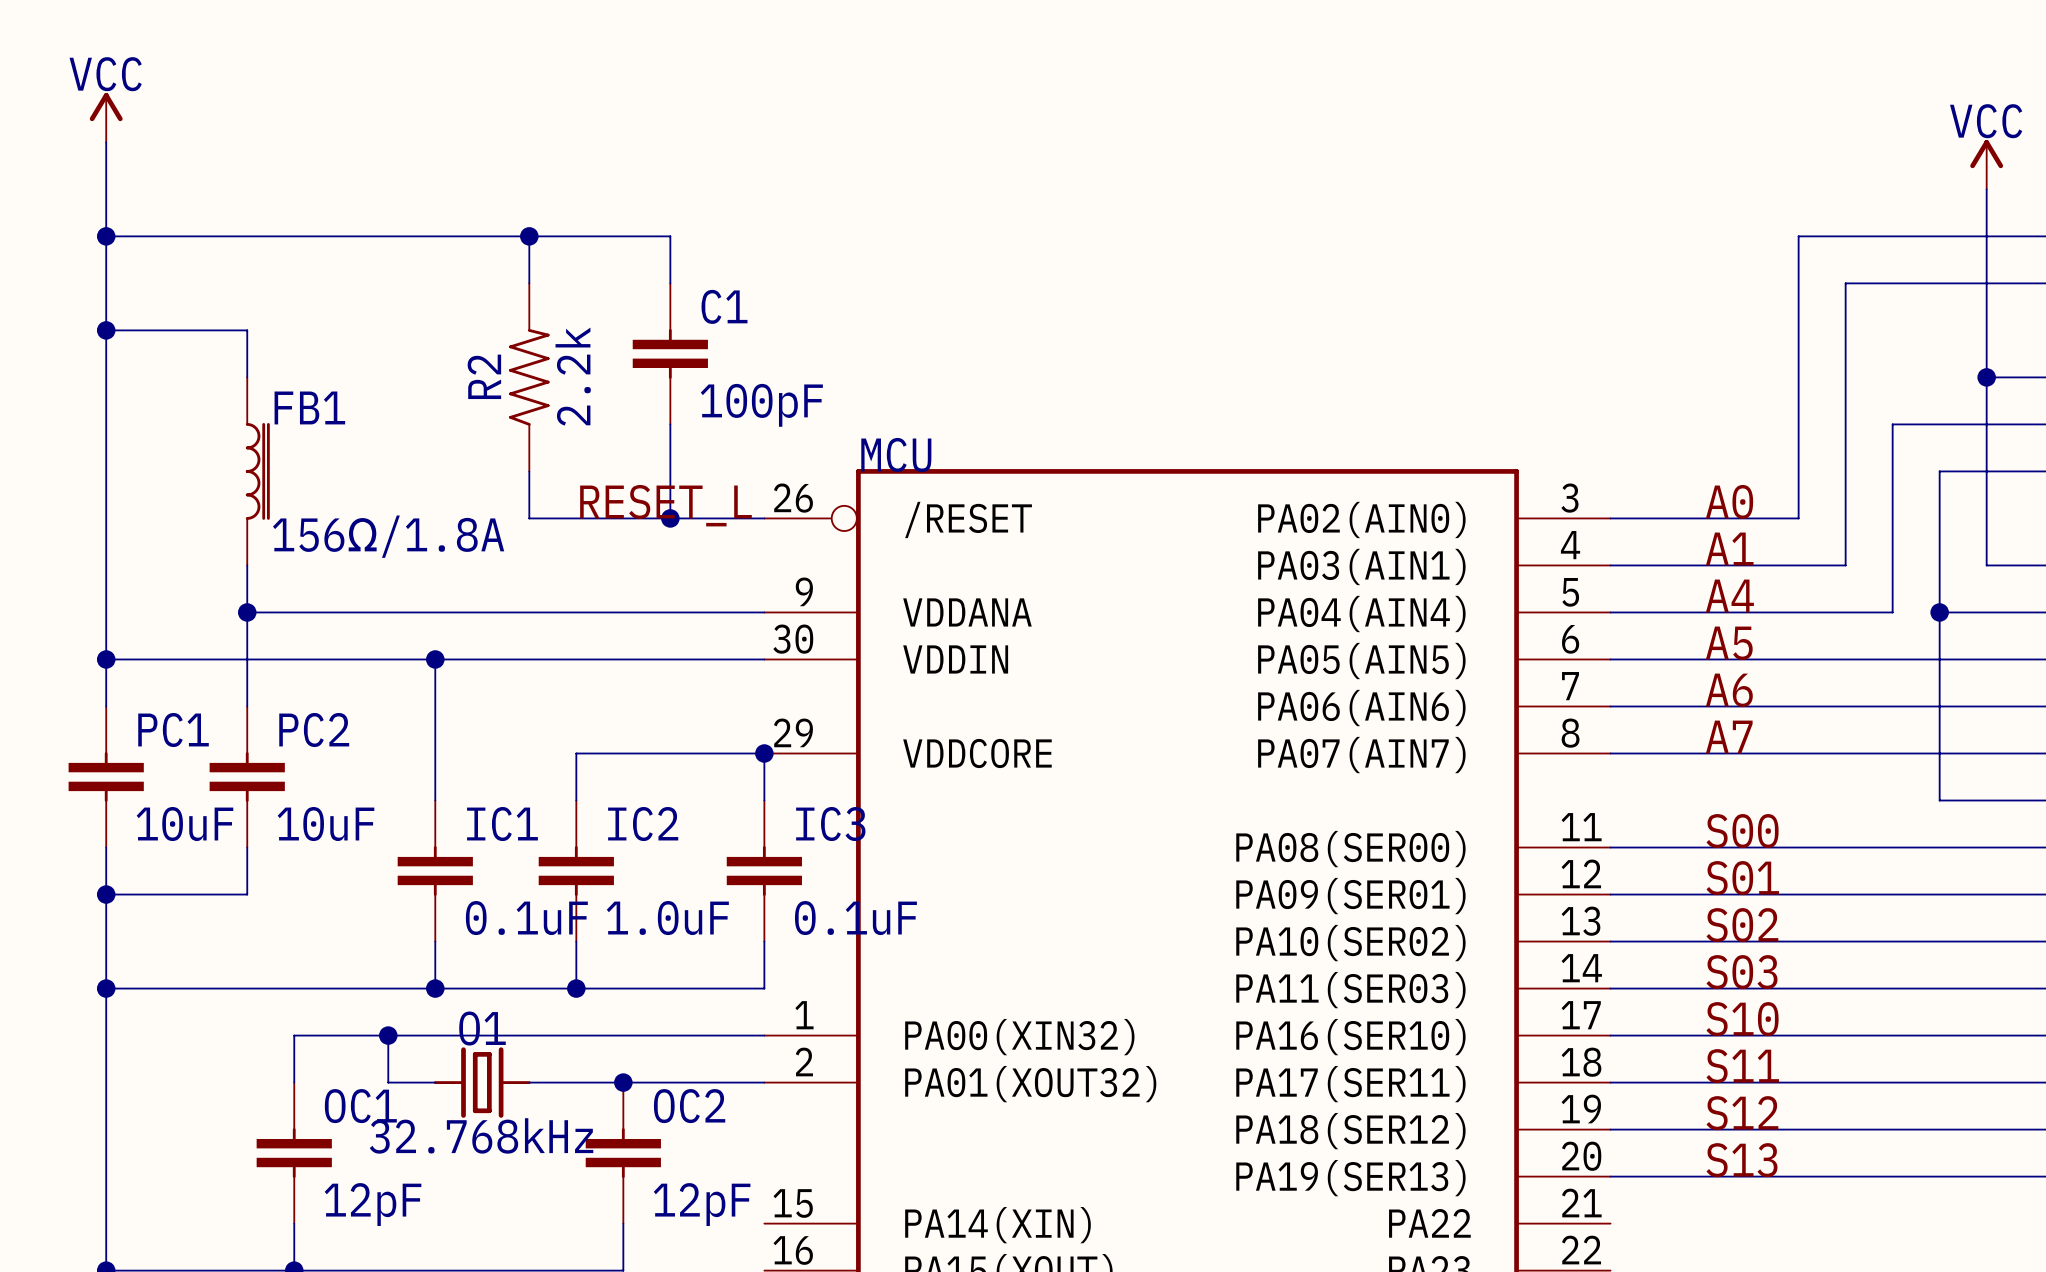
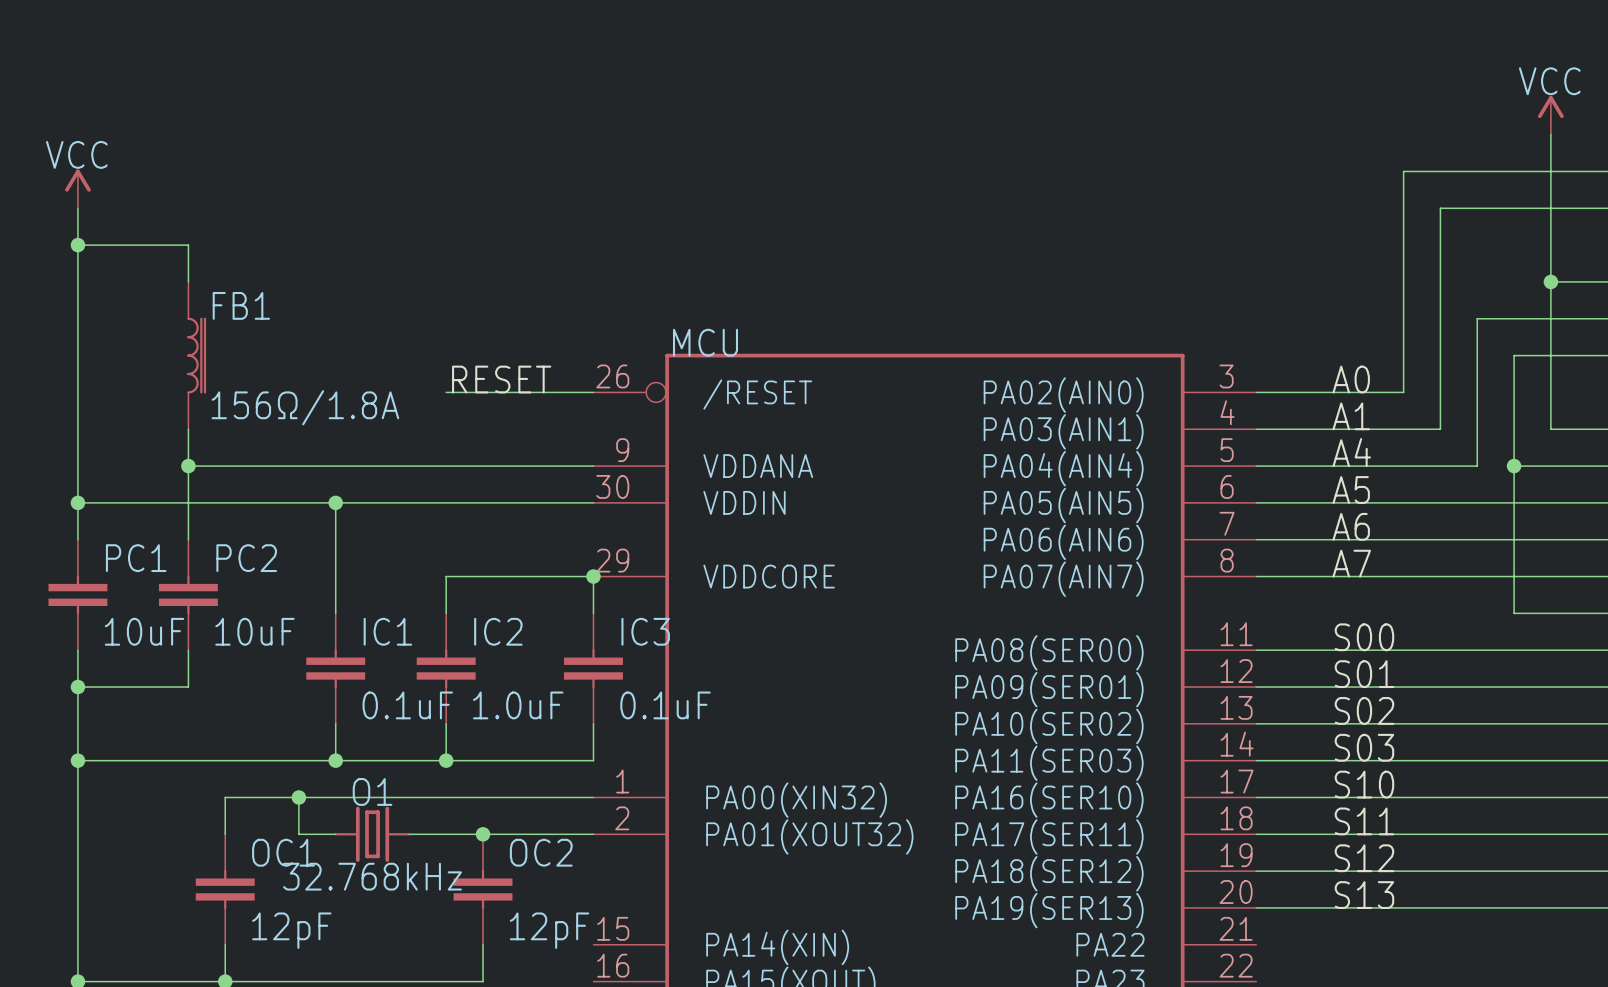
power symbol position: VCC (106, 117) -> VCC (77, 188)
wire: (106, 142) (106, 283) -> none
wire: (106, 236) (670, 236) (670, 283) -> none
junction: (106, 236) -> none
wire: (529, 236) (529, 283) -> none
junction: (529, 236) -> none
C1: 100pF (670, 353) -> none
R2: 2.2k (529, 377) -> none
wire: (670, 424) (670, 518) -> none
wire: (529, 471) (529, 518) (576, 518) -> none
label: RESET_L (665, 505) -> RESET (501, 379)
junction: (670, 518) -> none

